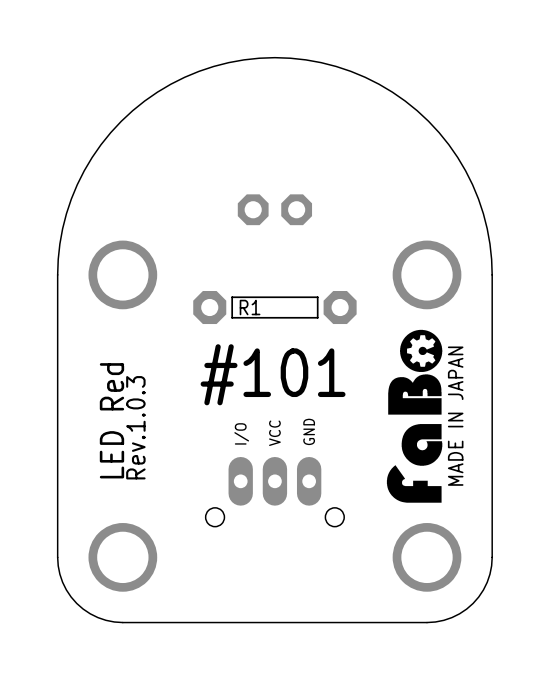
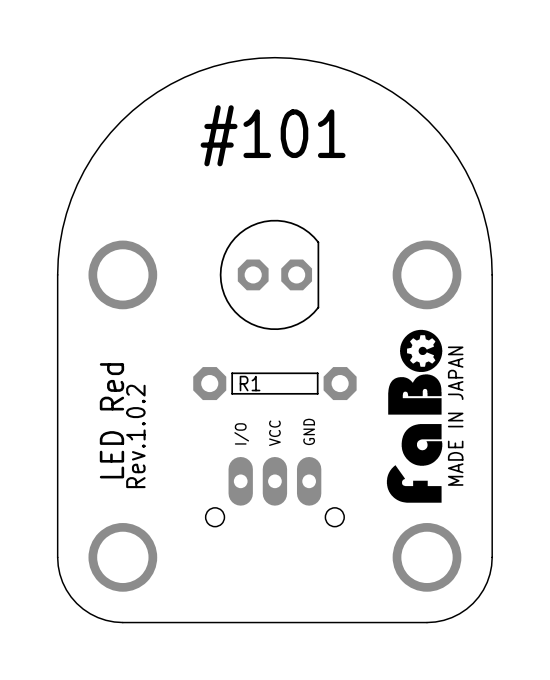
part: (274, 209) -> none
part: none -> (269, 274)
R1 position: (274, 307) -> (274, 383)
text position: #101 (273, 374) -> #101 (273, 135)
text: Rev.1.0.3 (135, 427) -> Rev.1.0.2 (135, 436)

